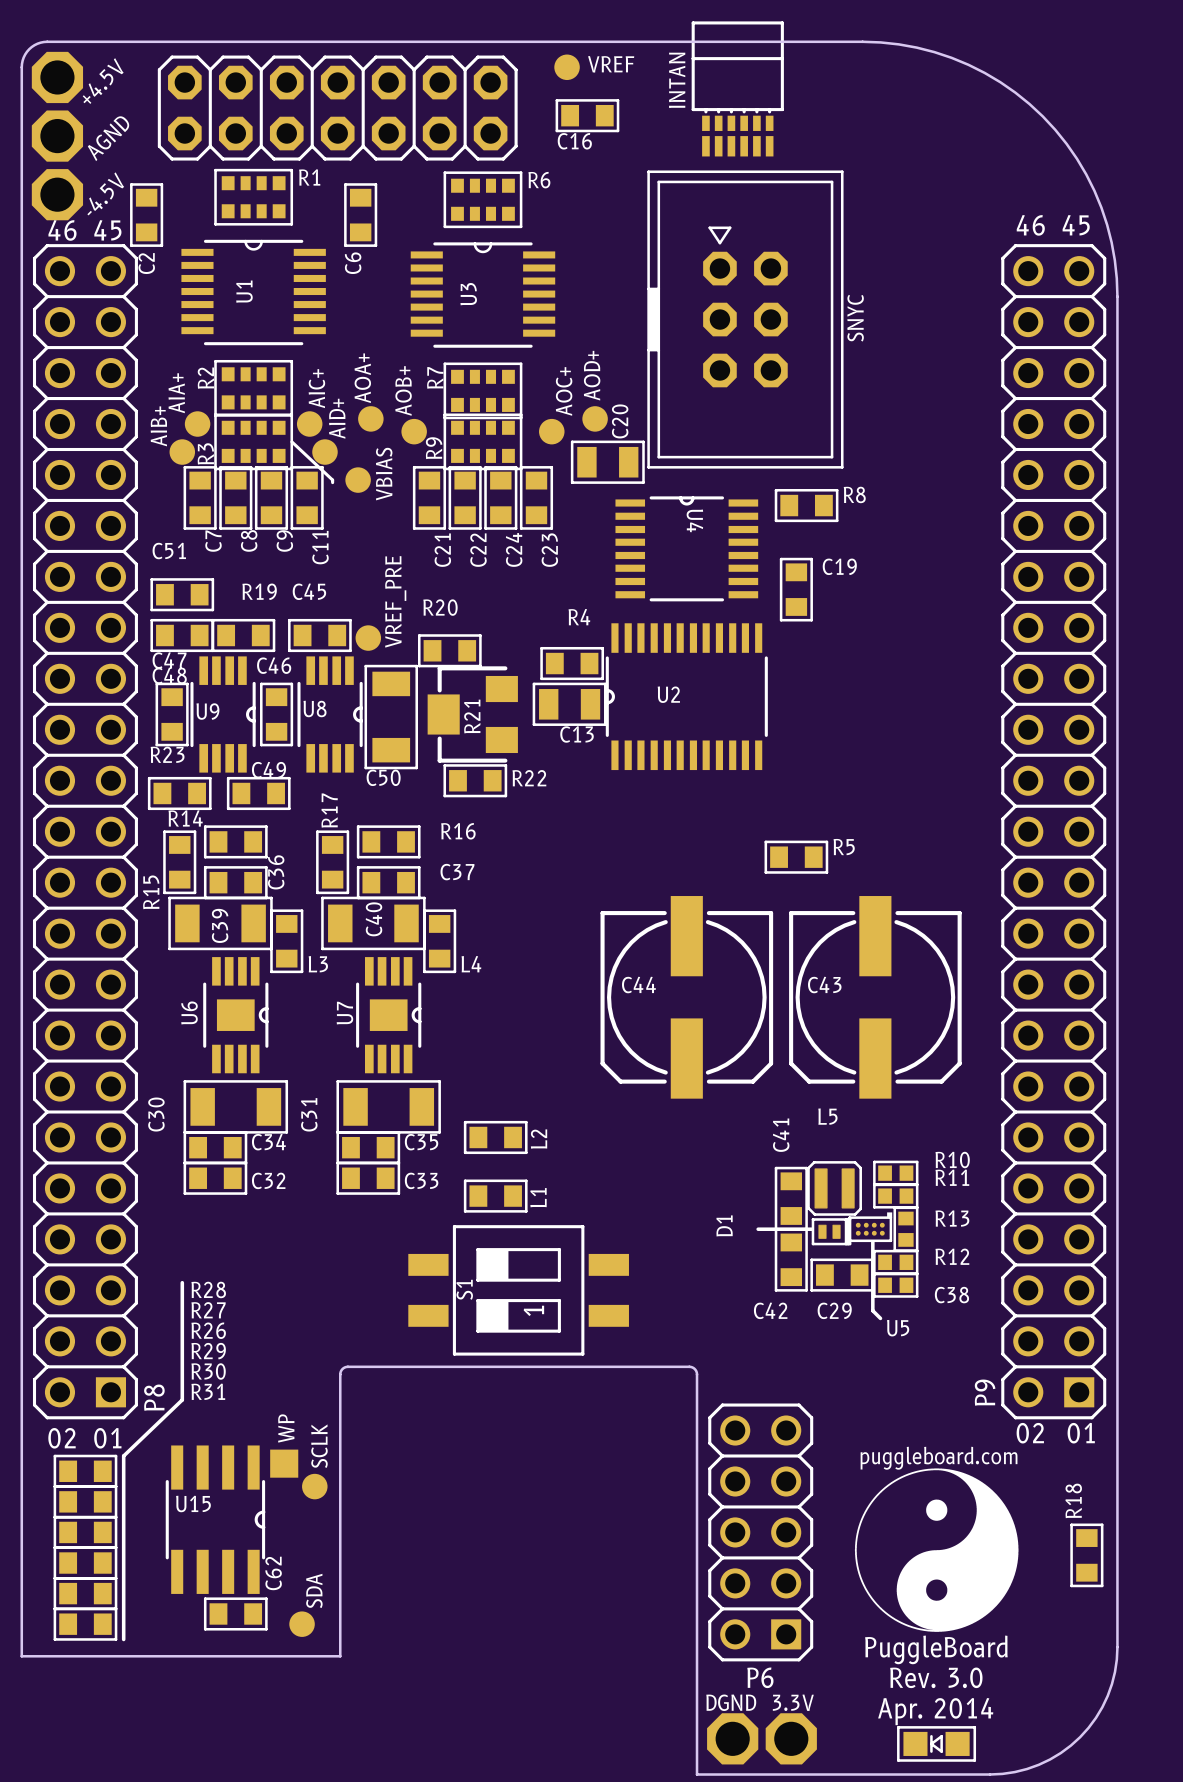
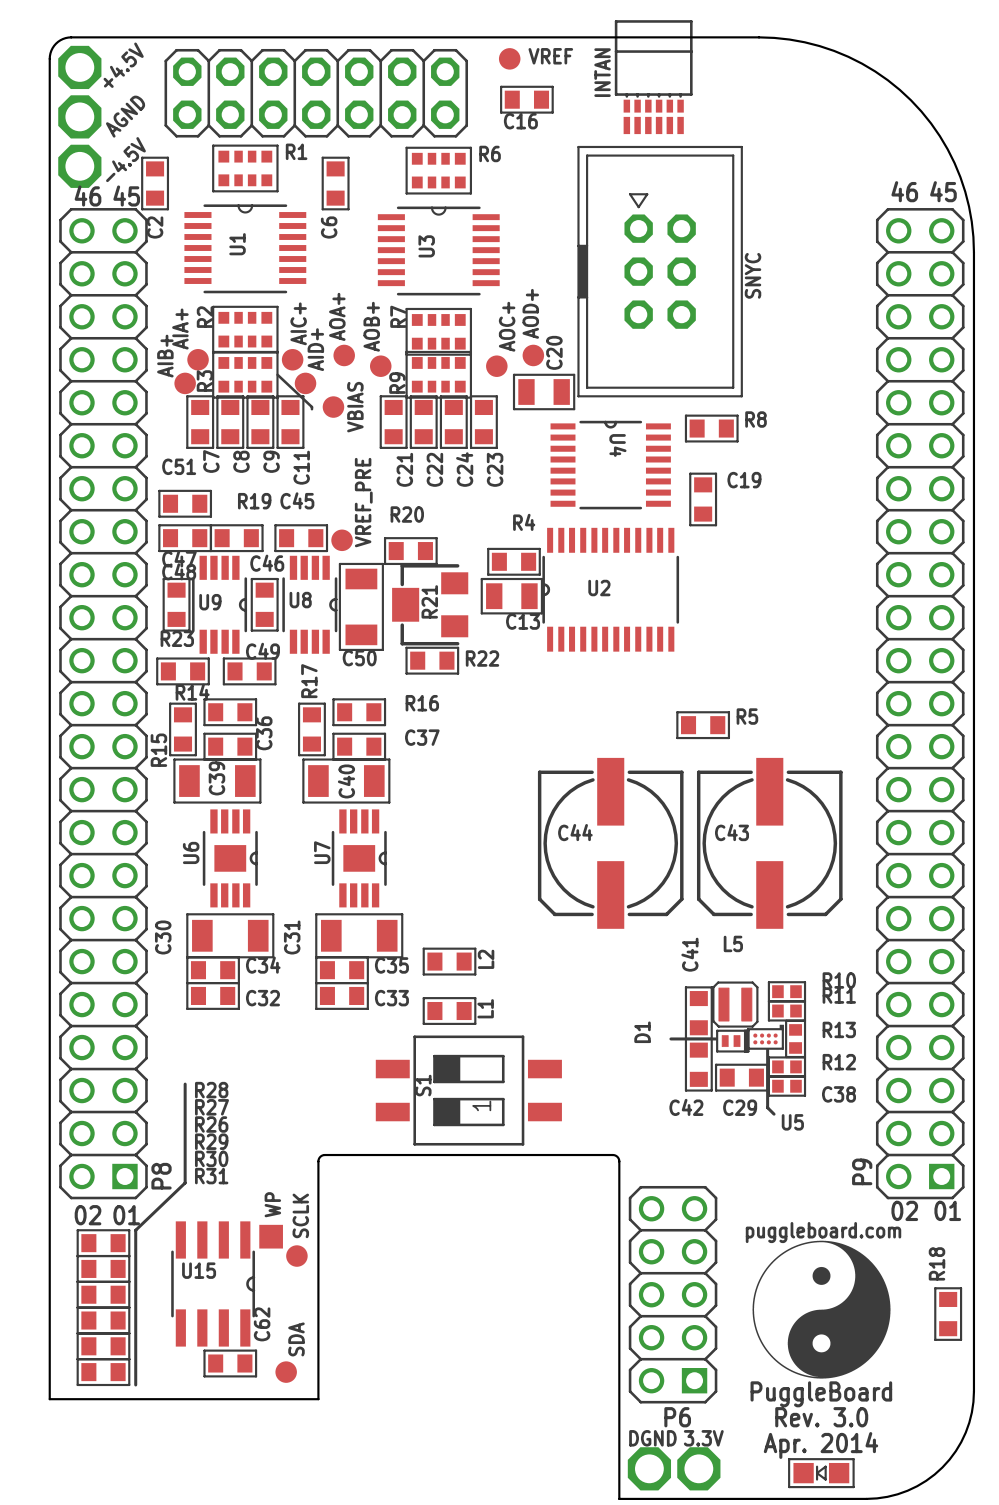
L3: (286, 941) -> none
L4: (439, 941) -> none

